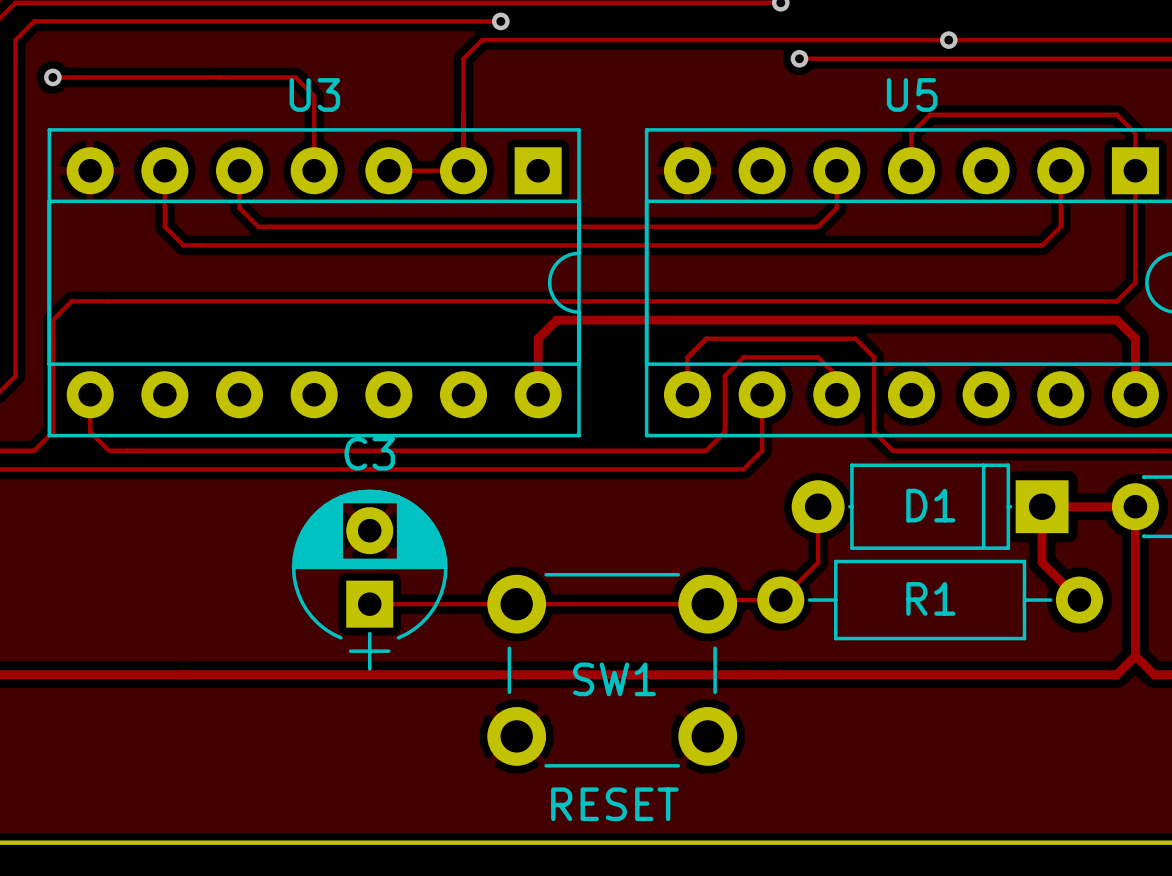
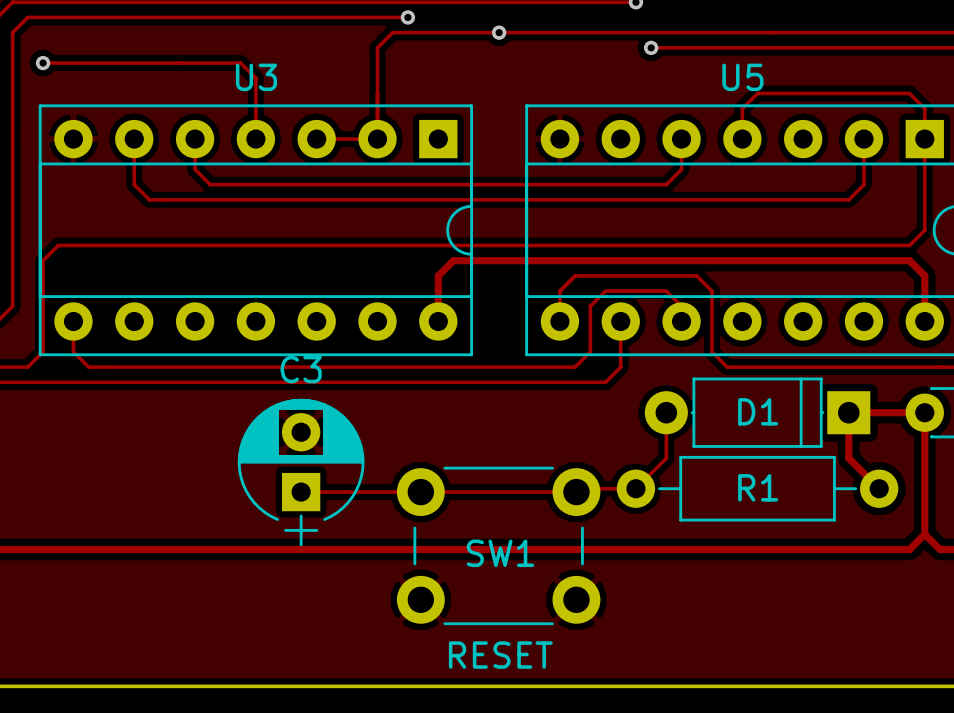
via: none -> (499, 32)
via: (948, 40) -> none

